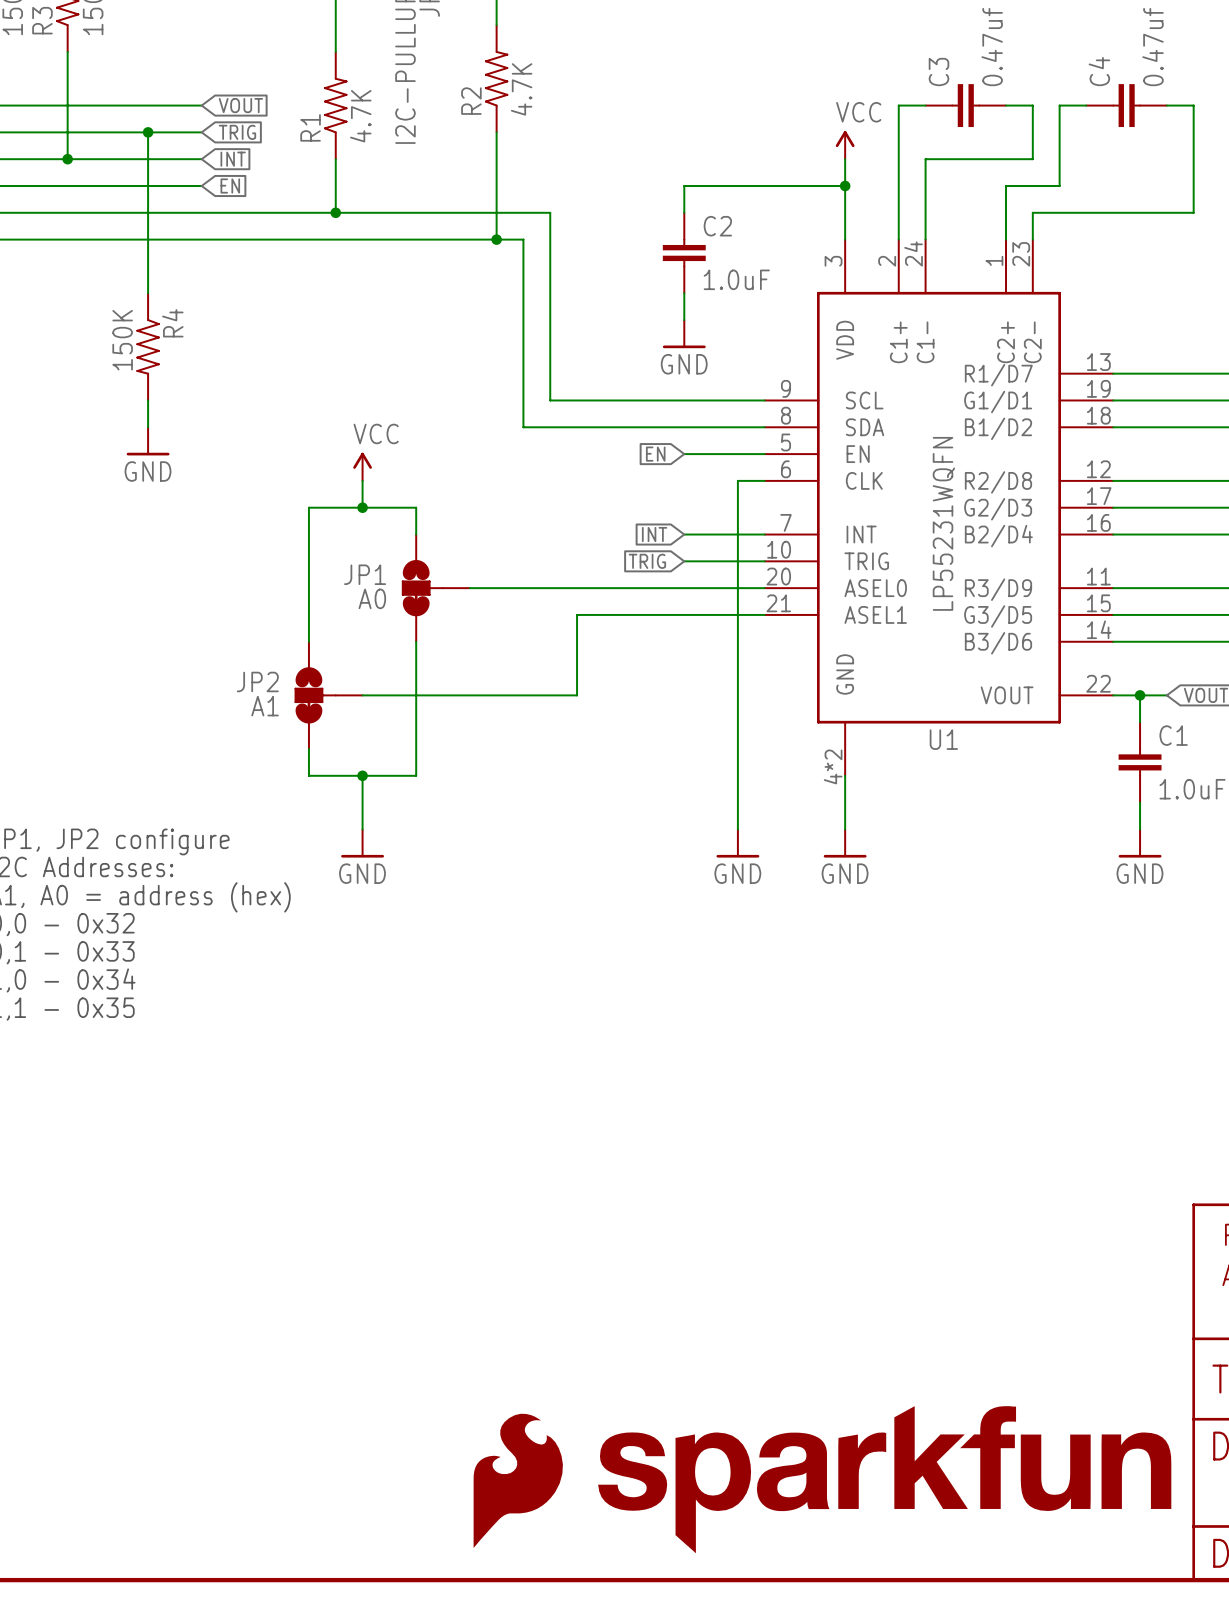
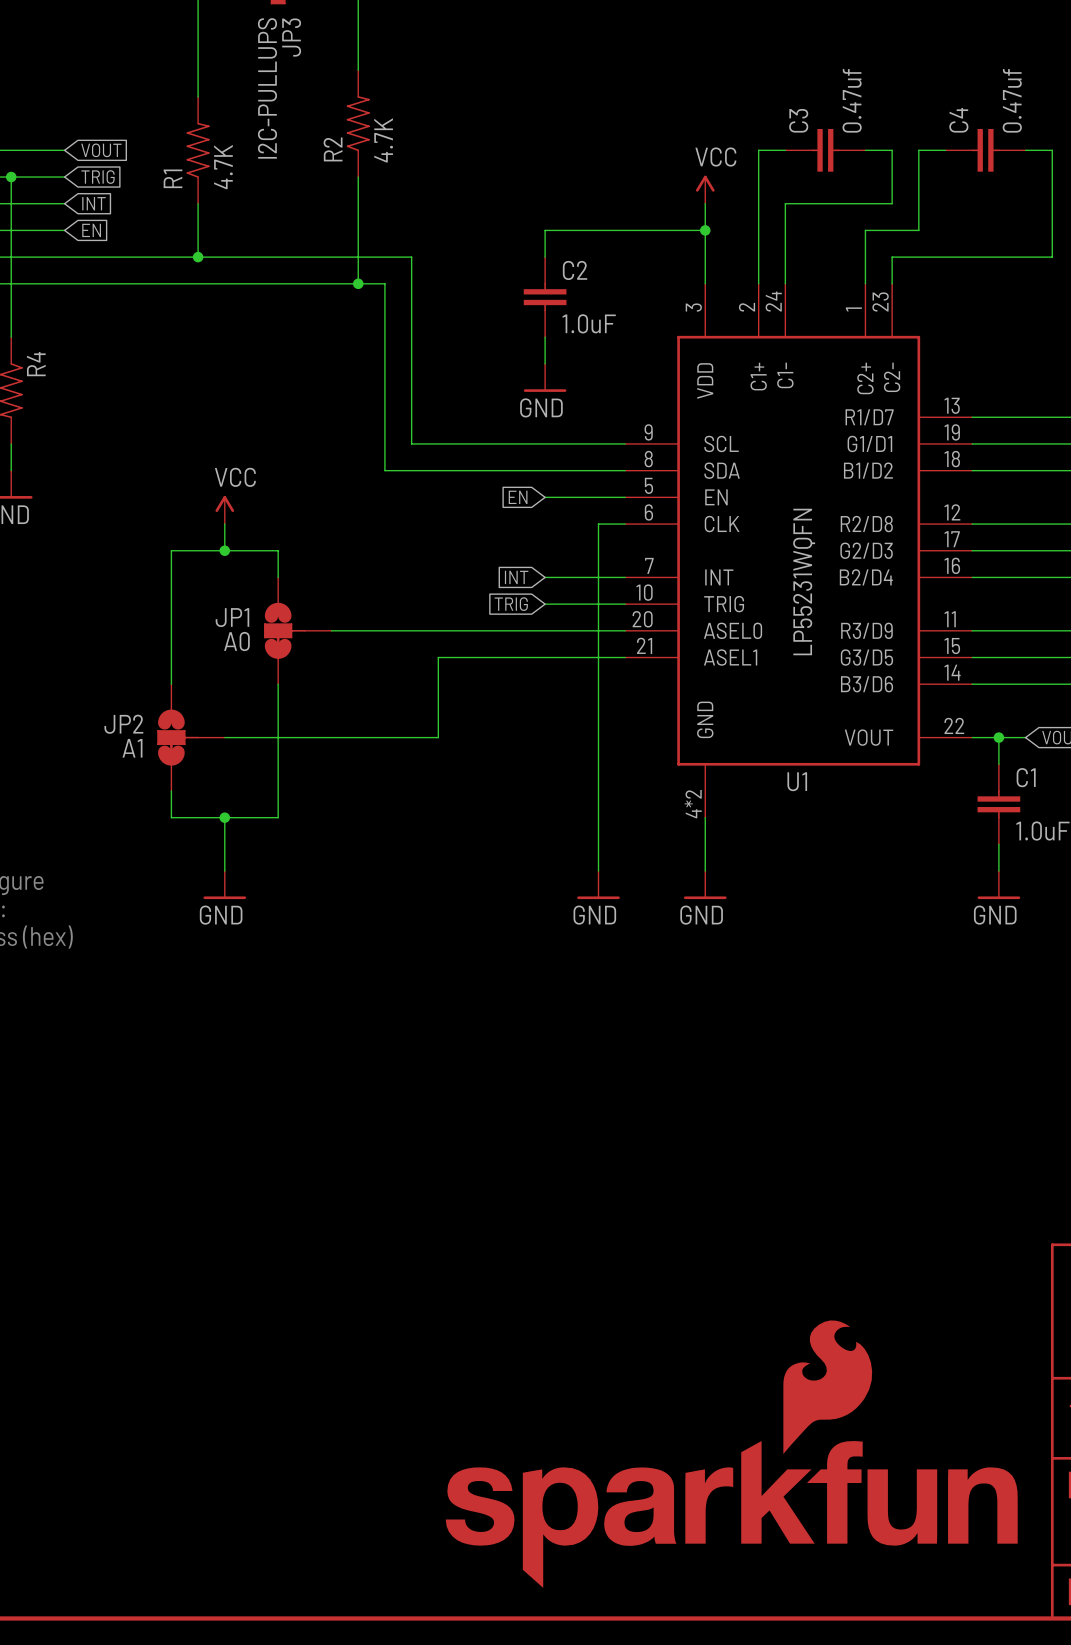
part: none -> (731, 1454)
part: (884, 1479) -> none
part: (518, 1480) -> none

